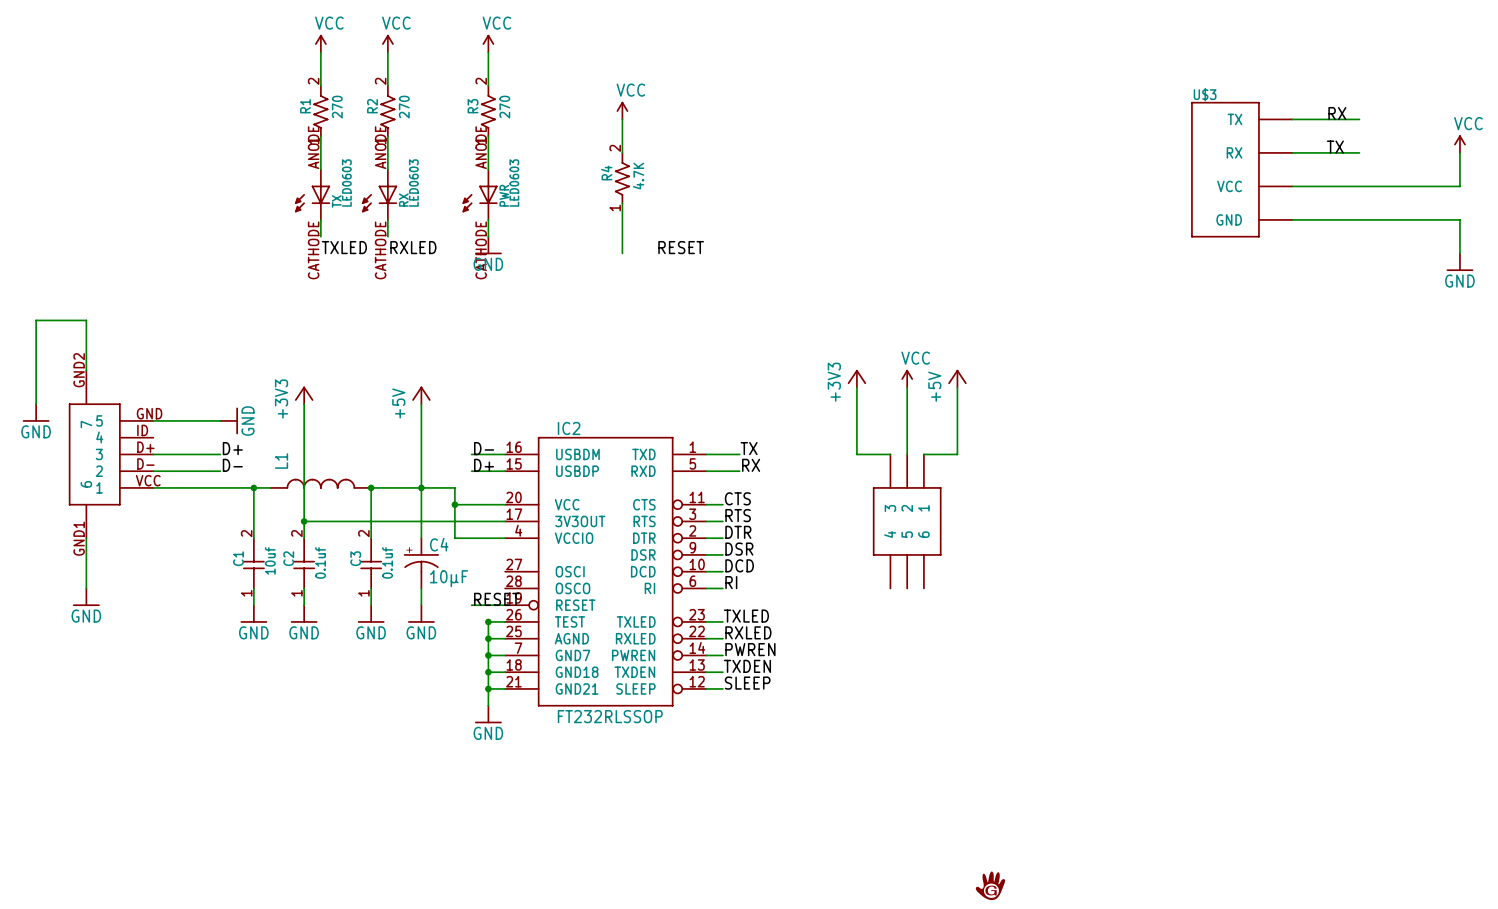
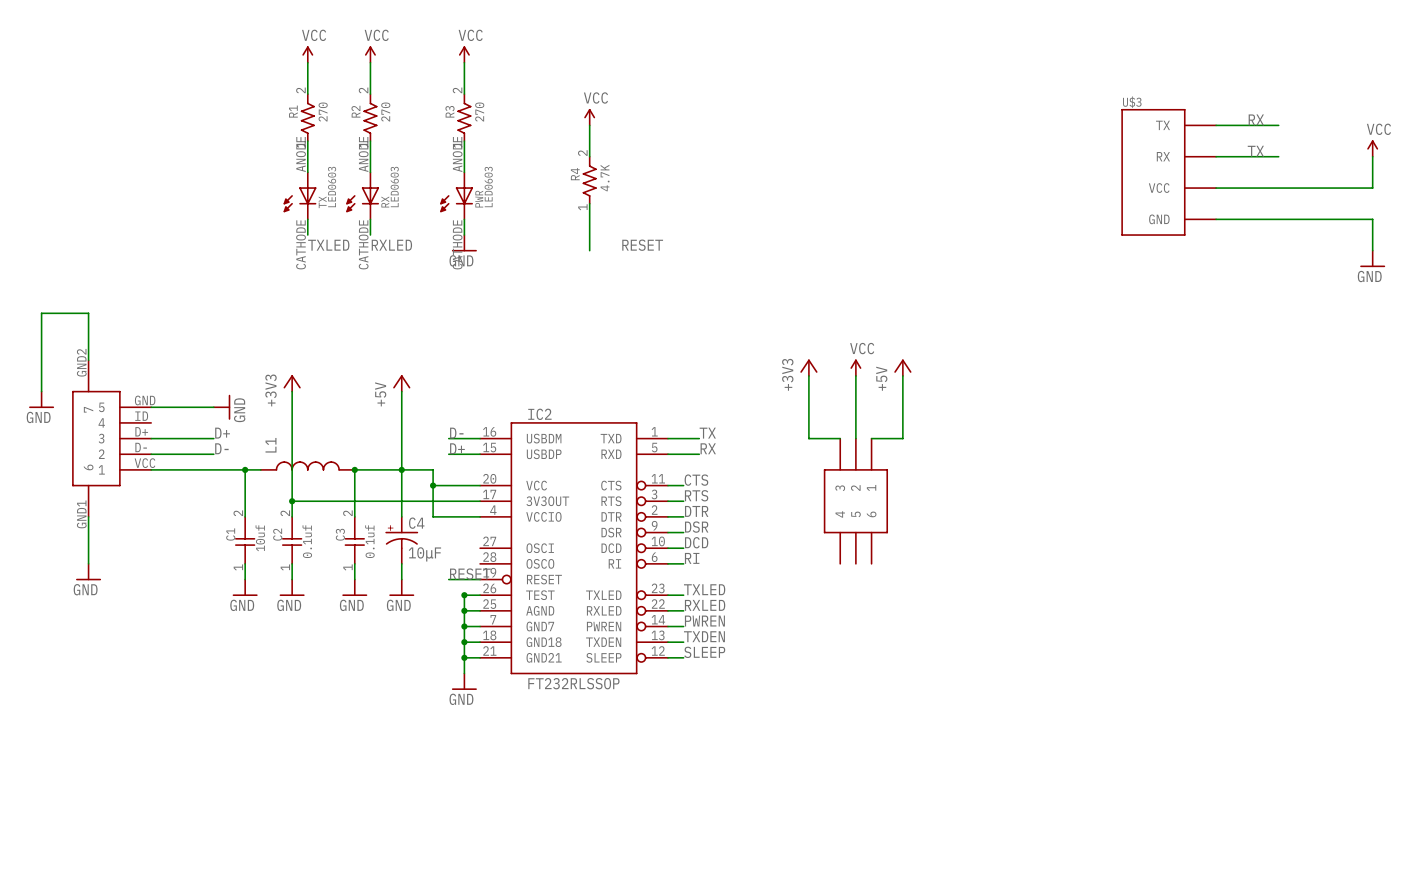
part: (990, 885) -> none

